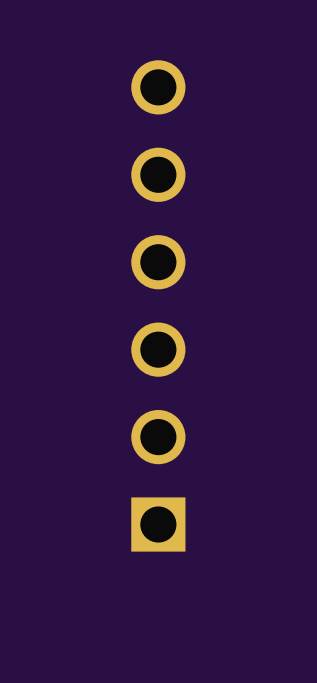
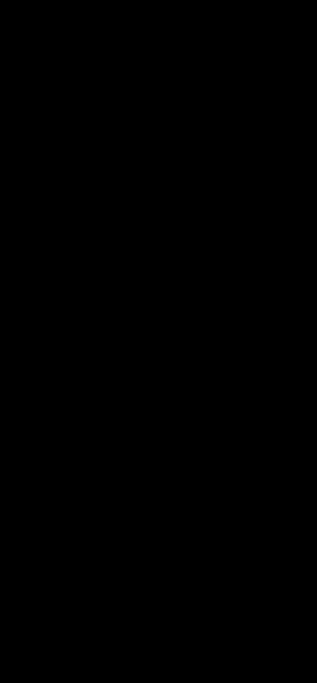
part: (158, 305) -> none

